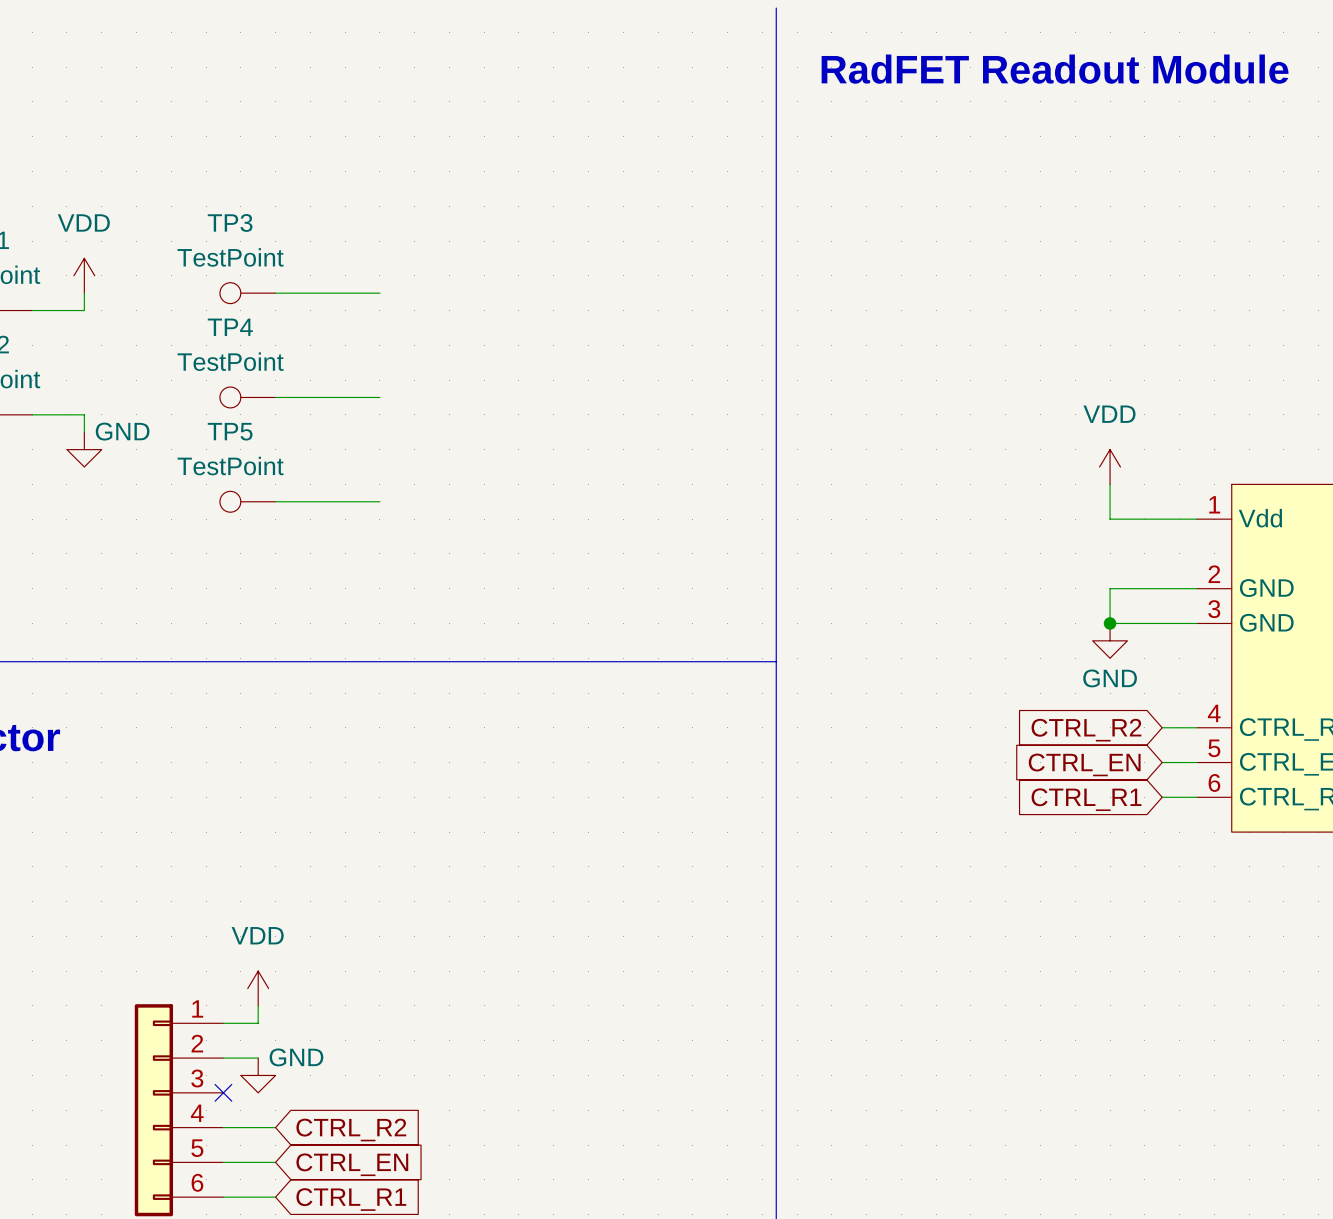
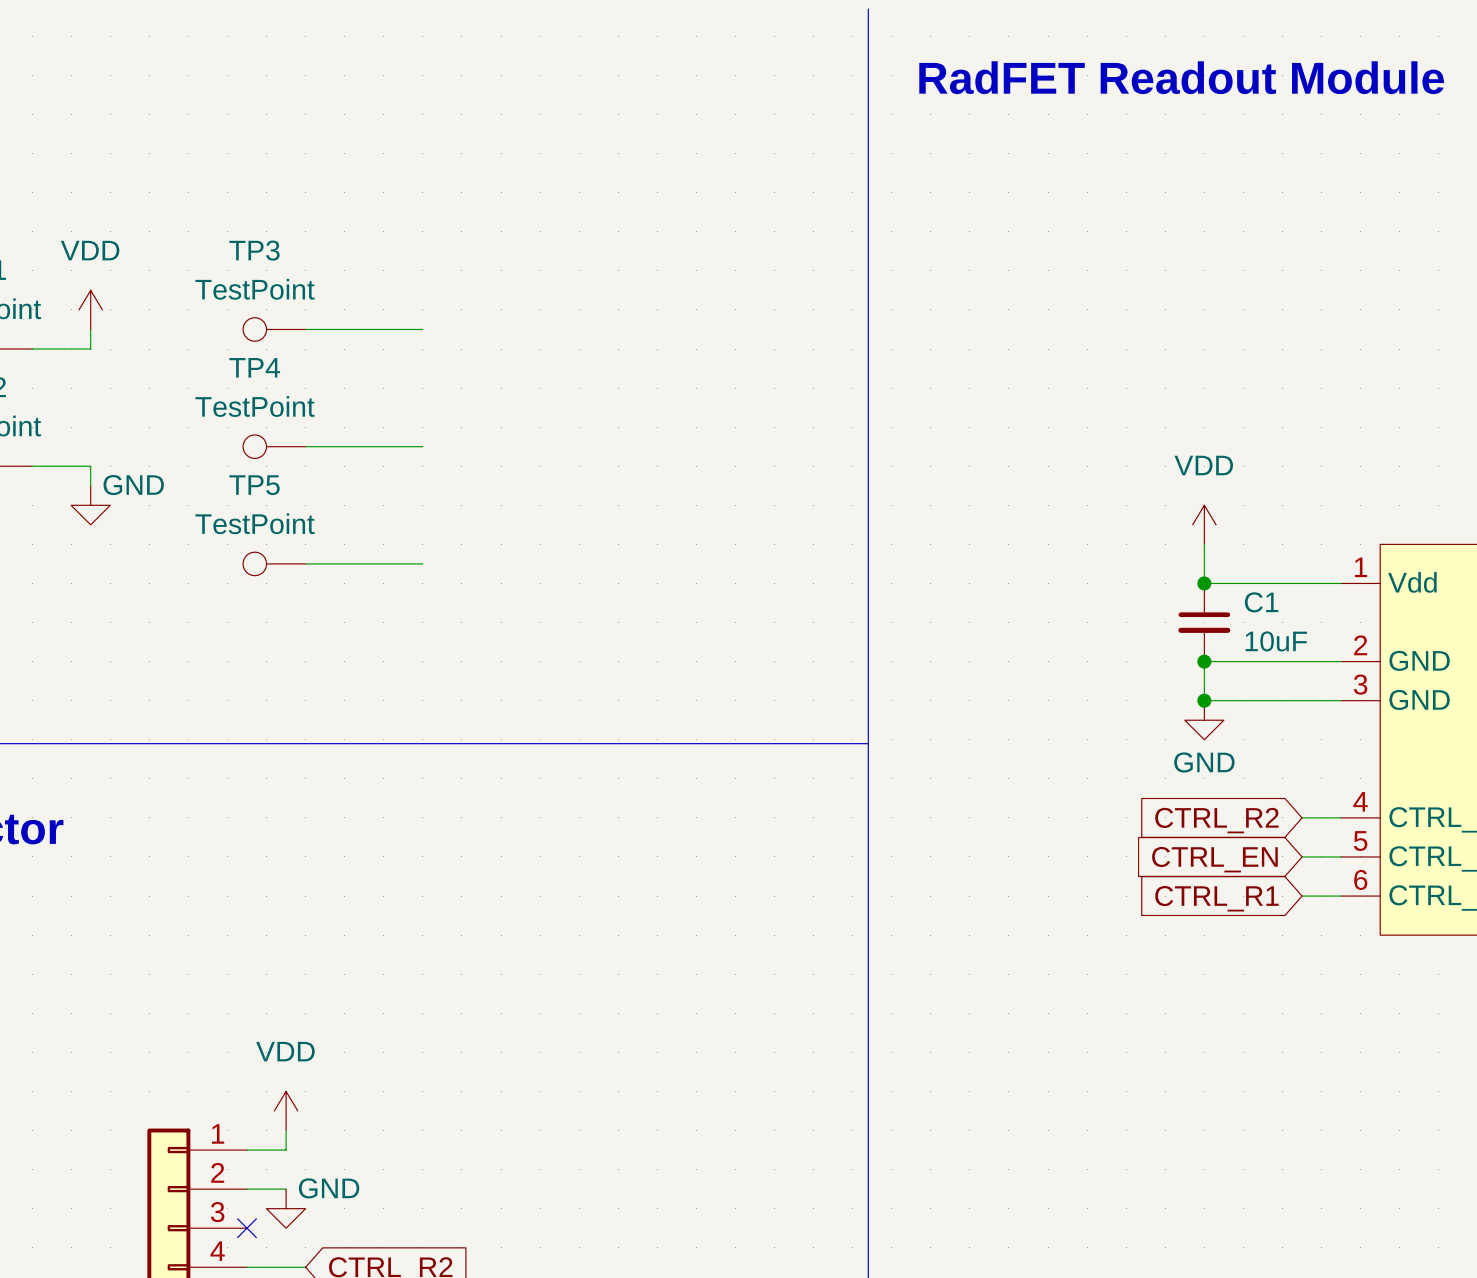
power symbol position: VDD (1110, 467) -> VDD (1204, 524)
wire: (1110, 484) (1110, 519) -> (1204, 544) (1204, 583) (1243, 583)
junction: none -> (1204, 583)
C1: none -> 10uF (1204, 622)
junction: none -> (1204, 661)
wire: (1110, 588) (1110, 623) -> (1243, 661) (1204, 661) (1204, 700) (1243, 700)
junction: none -> (1204, 700)
junction: (1110, 623) -> none
power symbol position: GND (1110, 640) -> GND (1204, 720)

